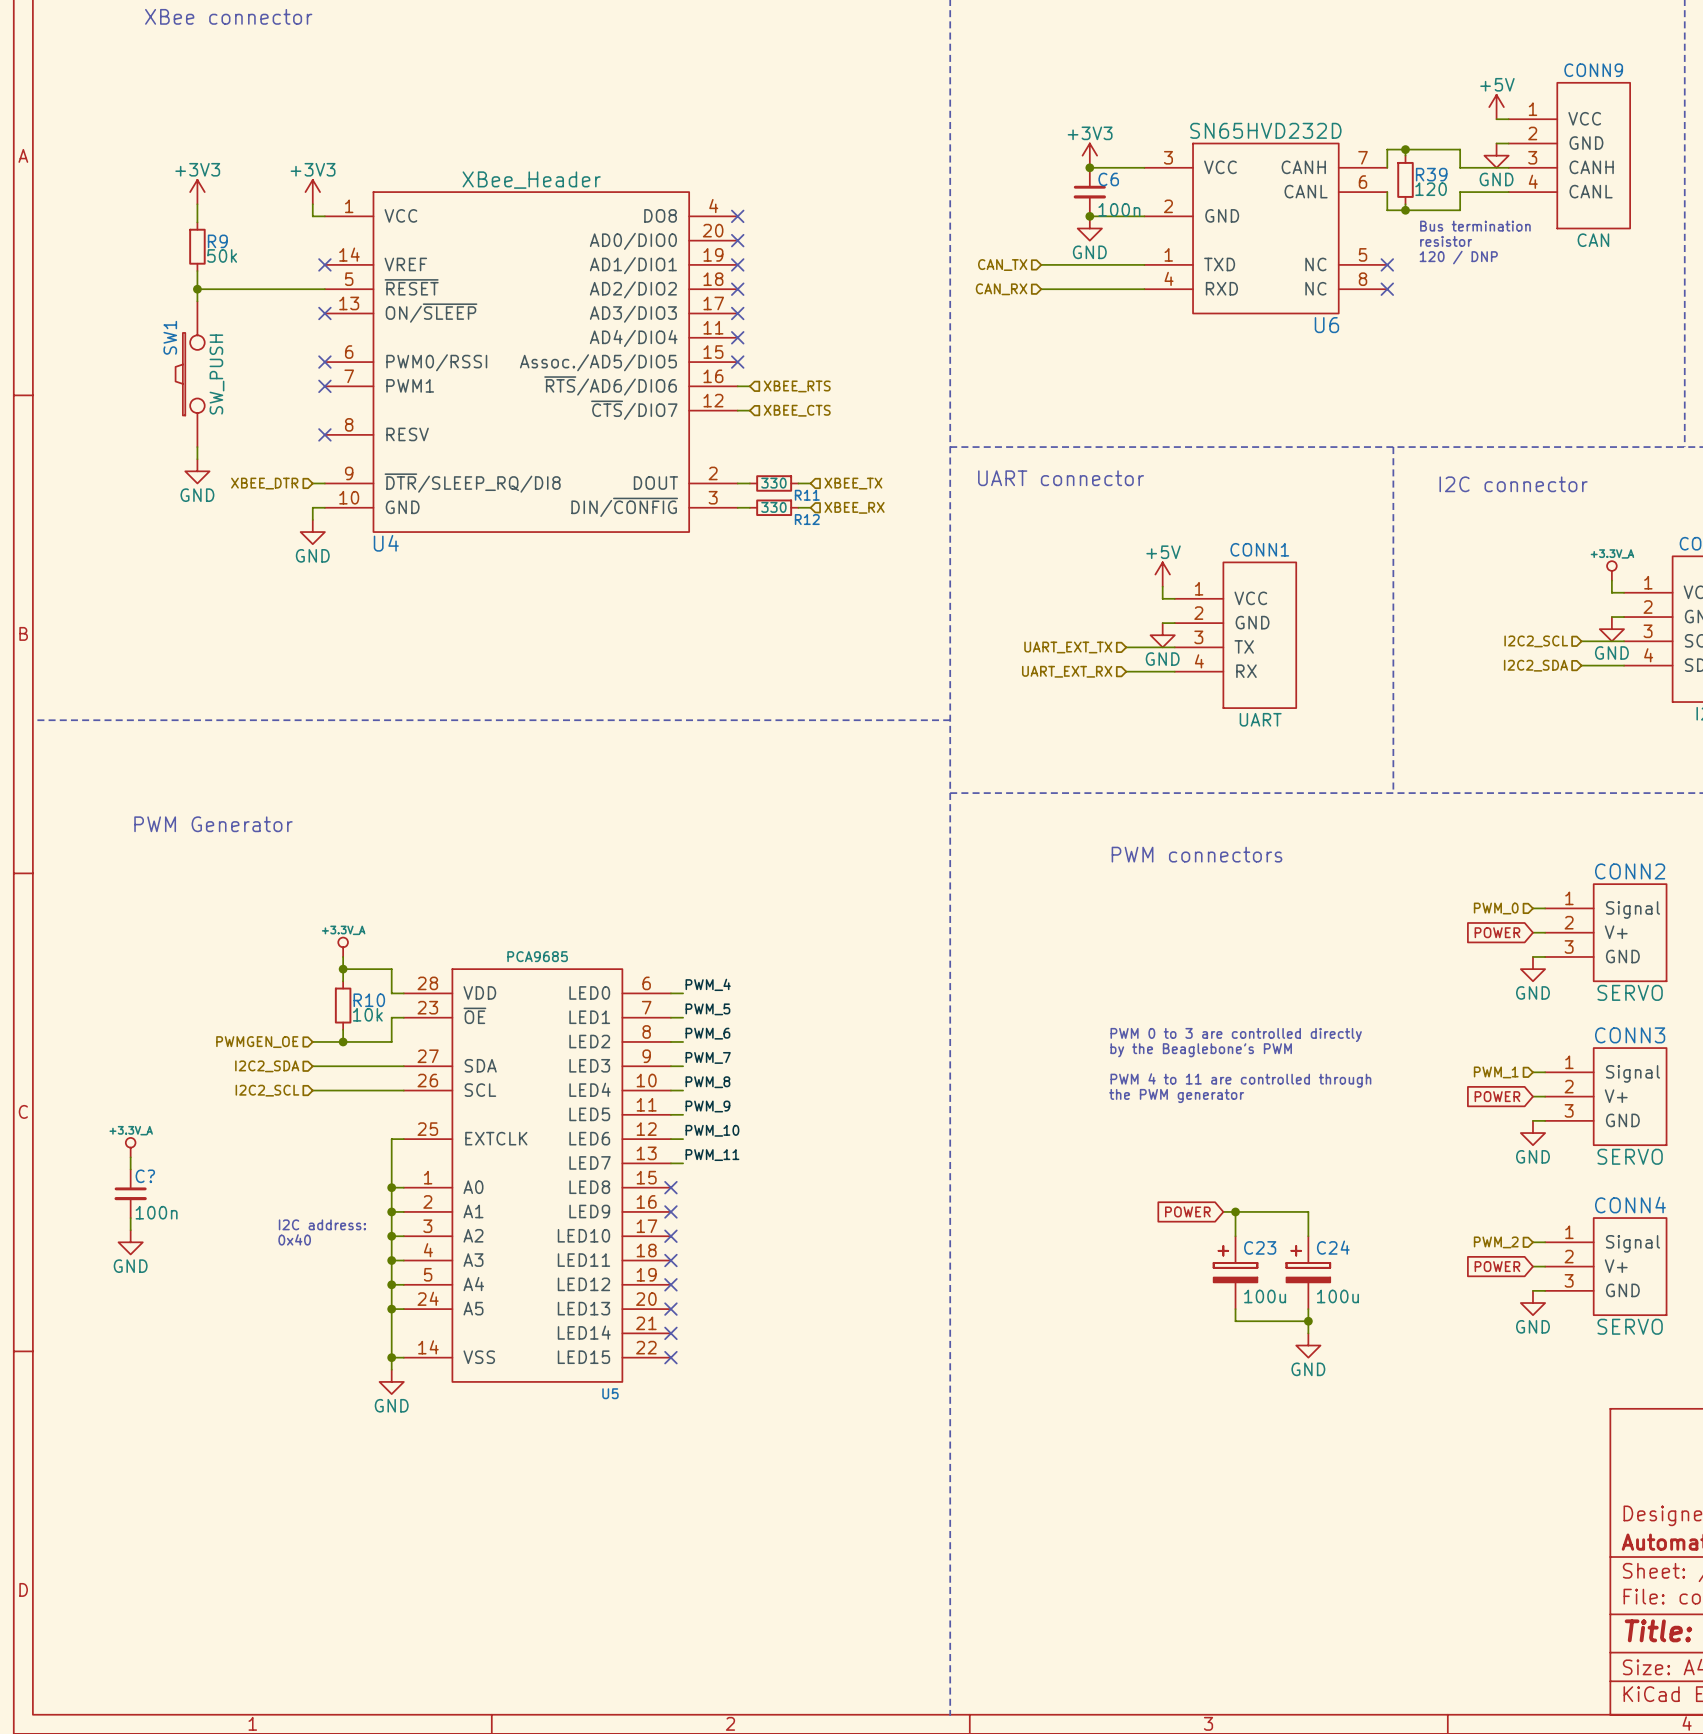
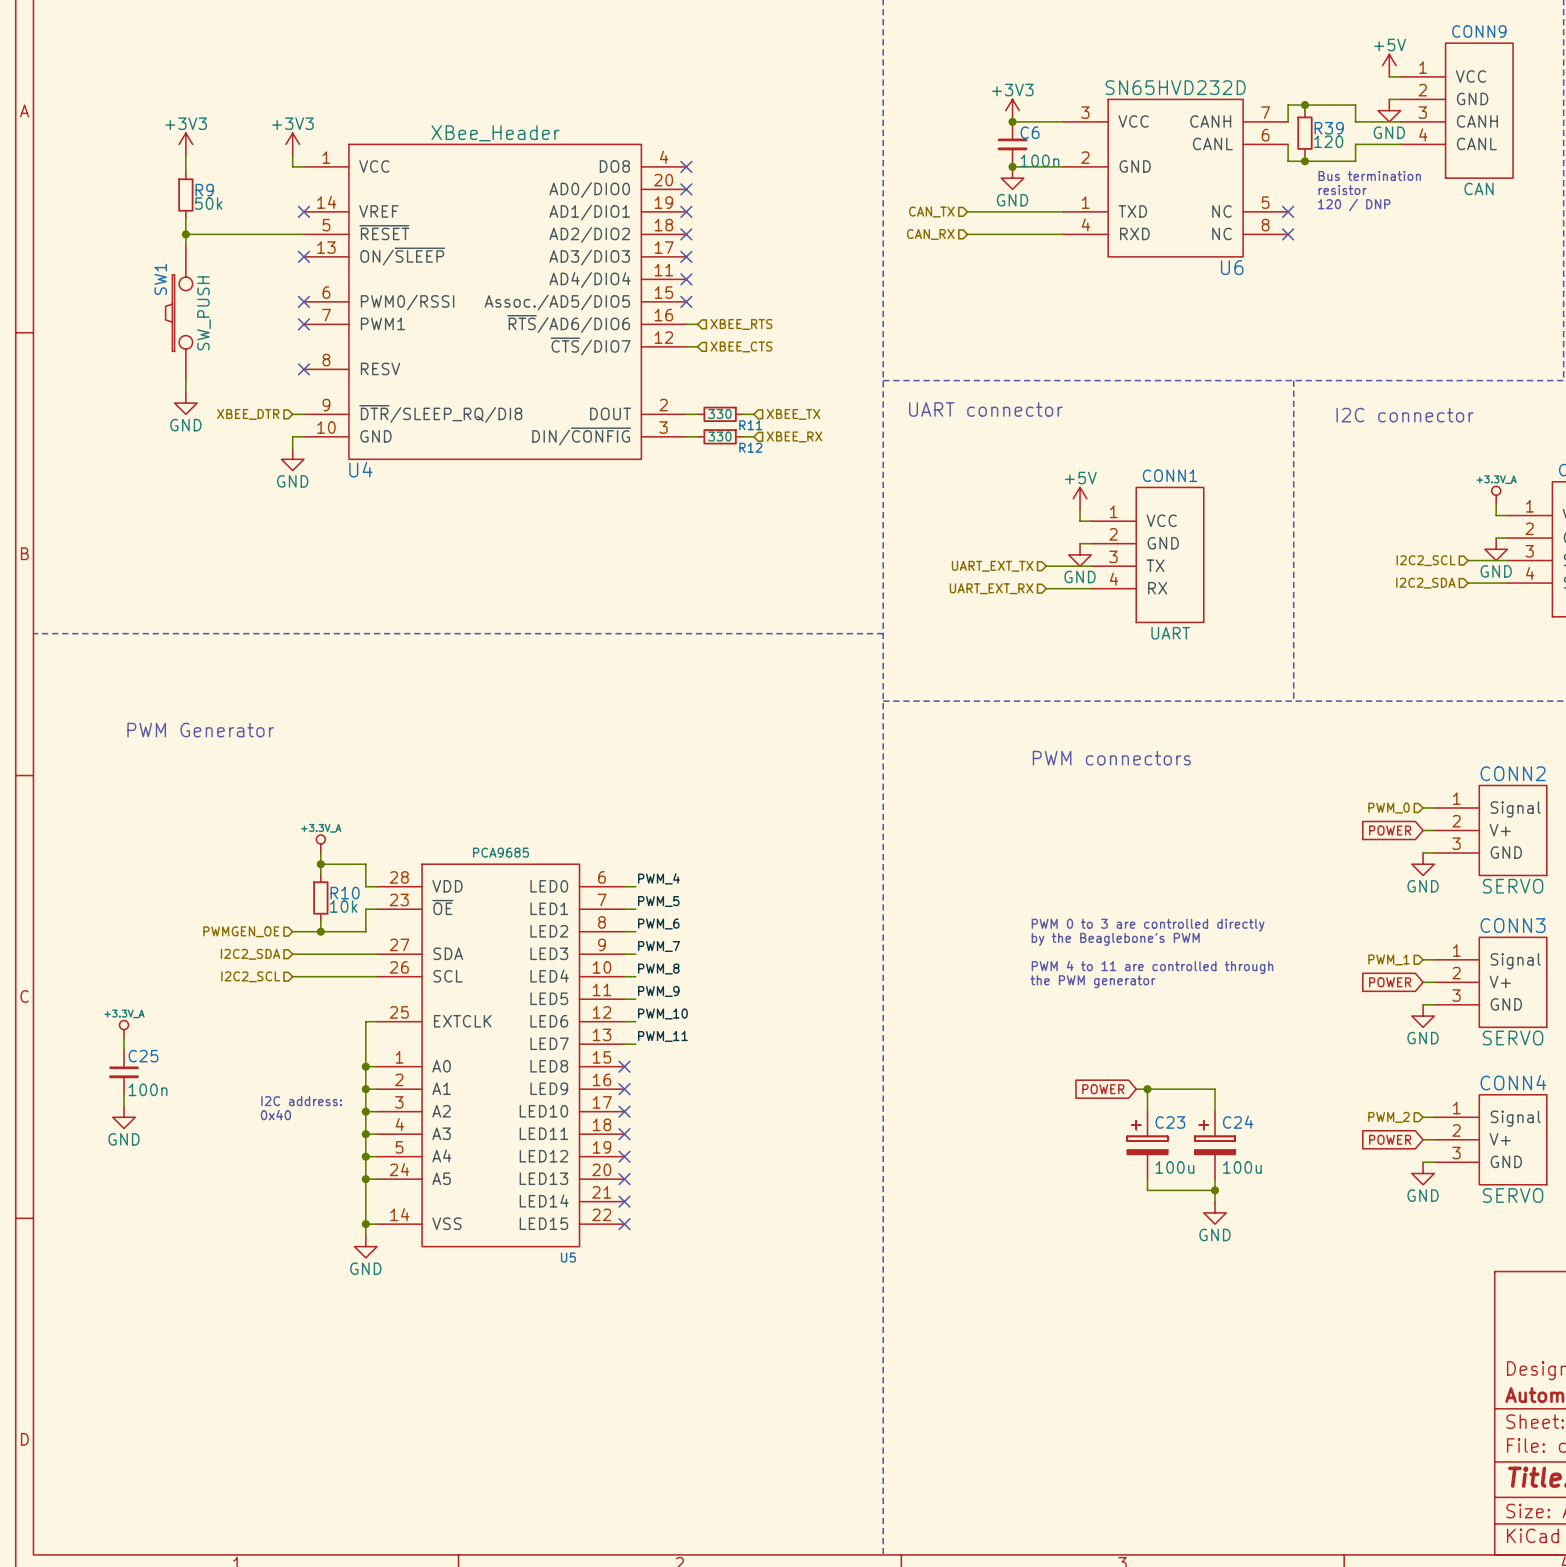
C? name: C? (145, 1176) -> C25 (143, 1056)

